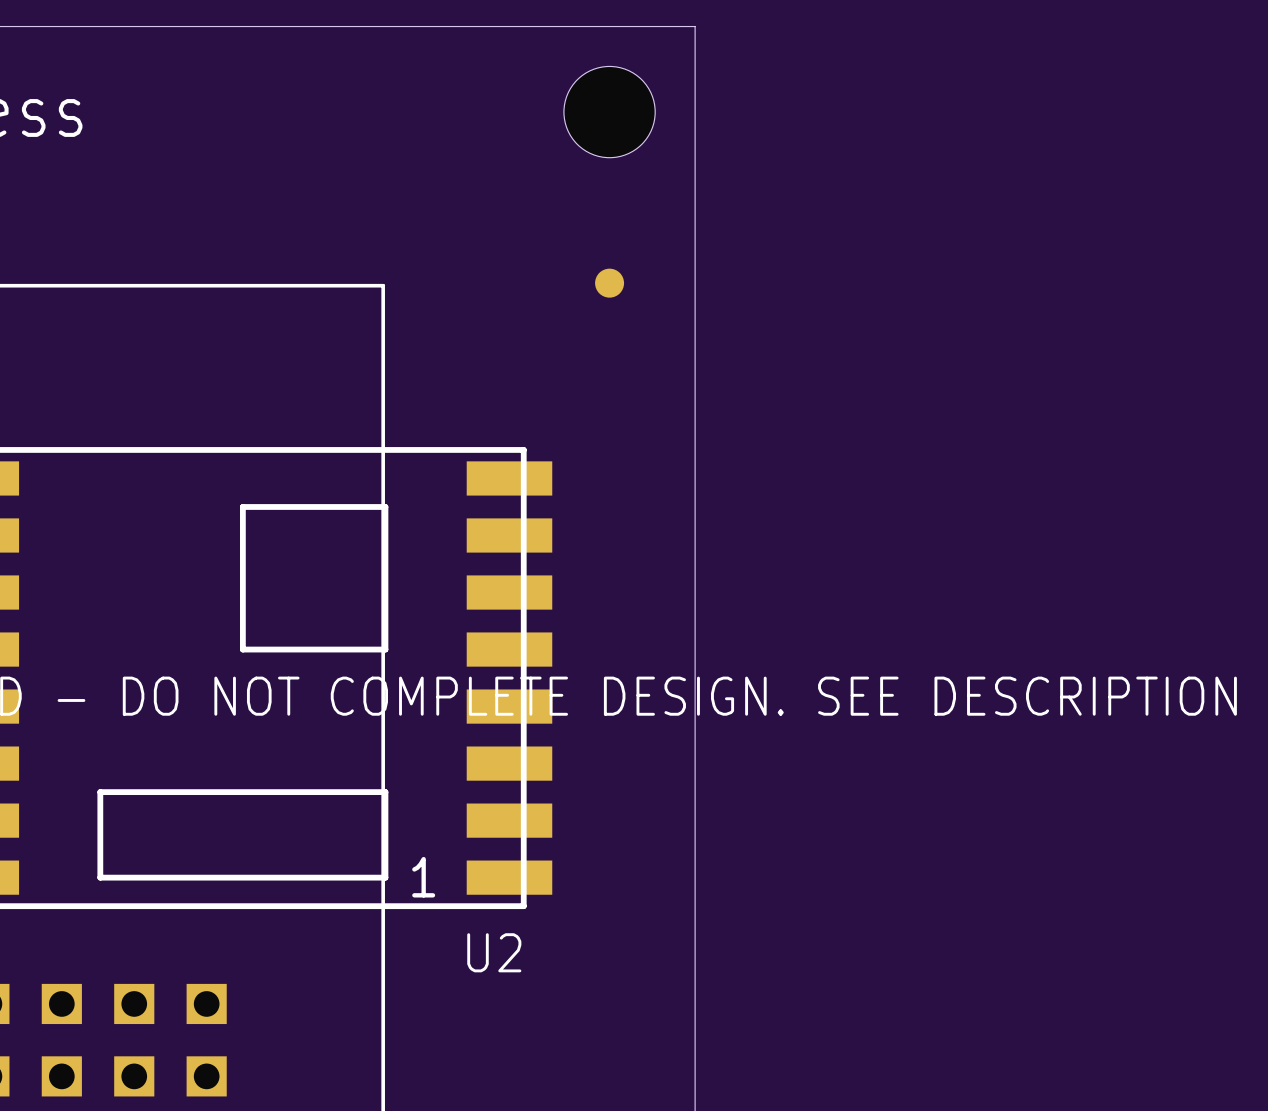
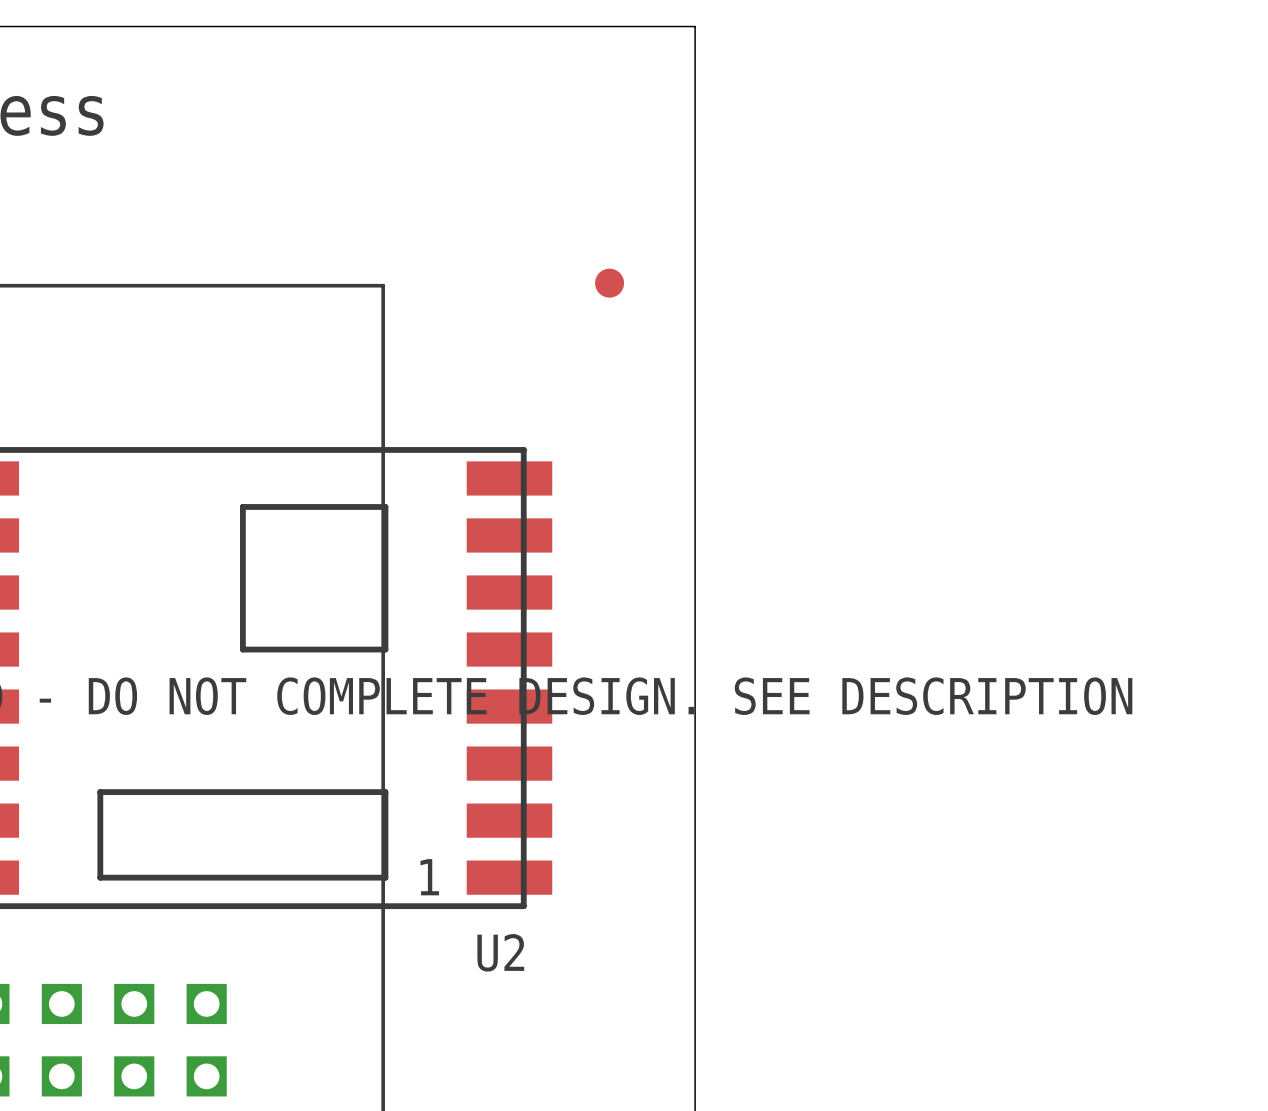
hole: (609, 112) -> none

